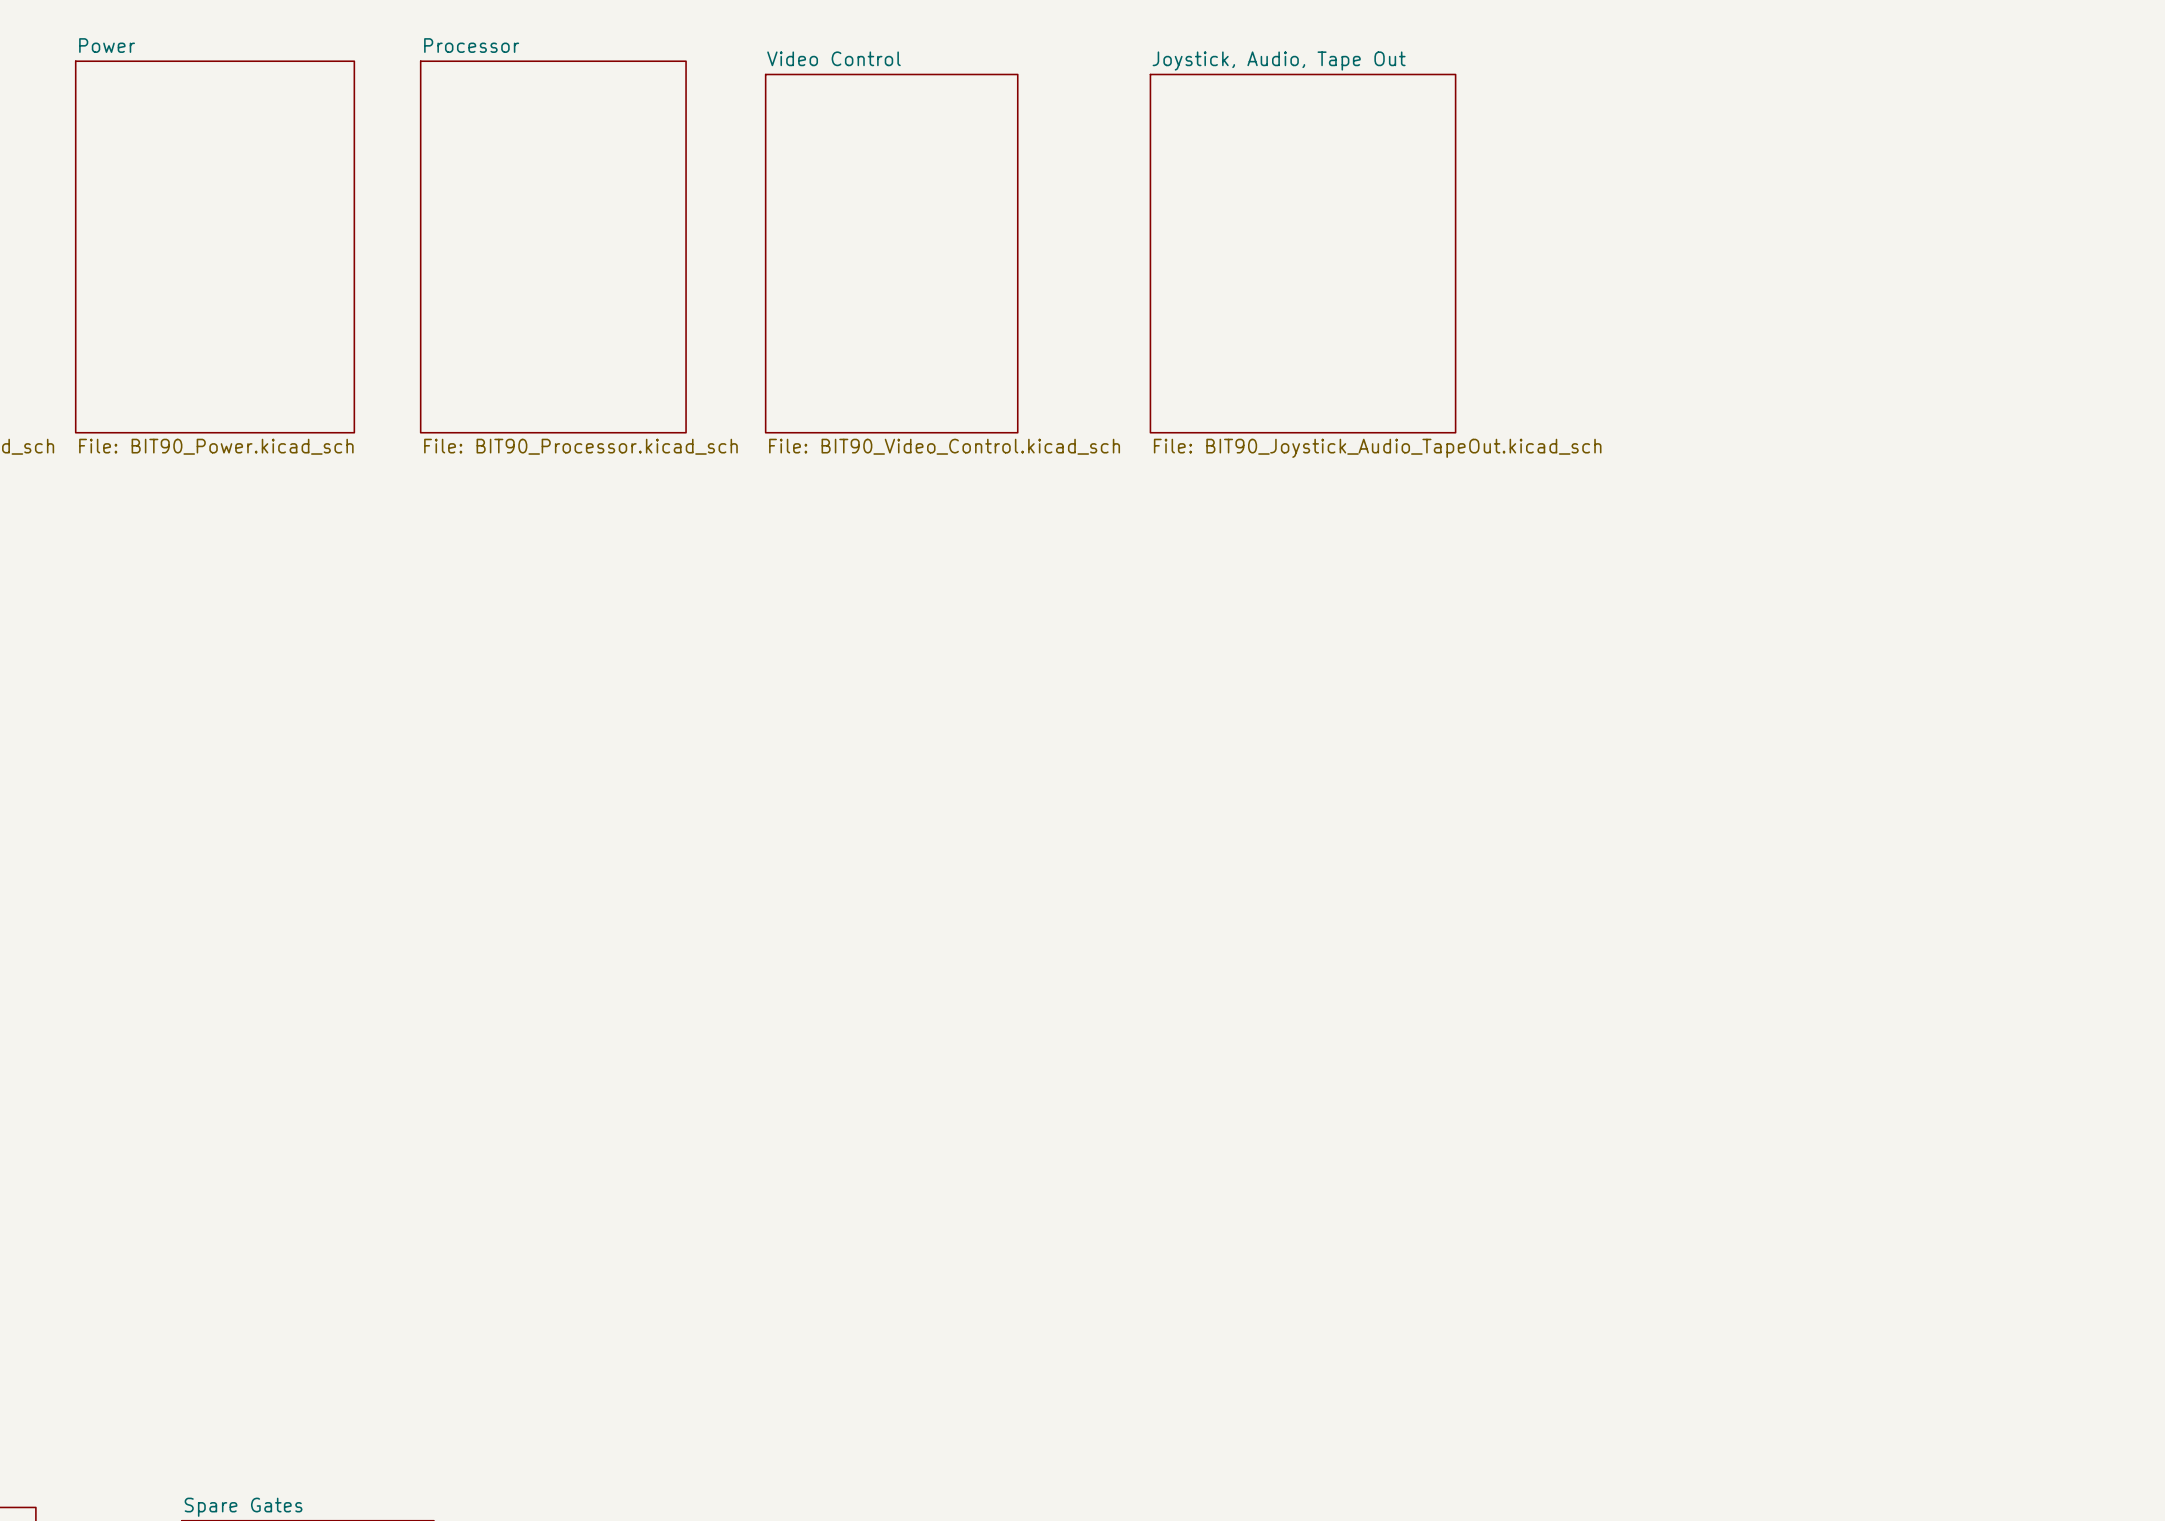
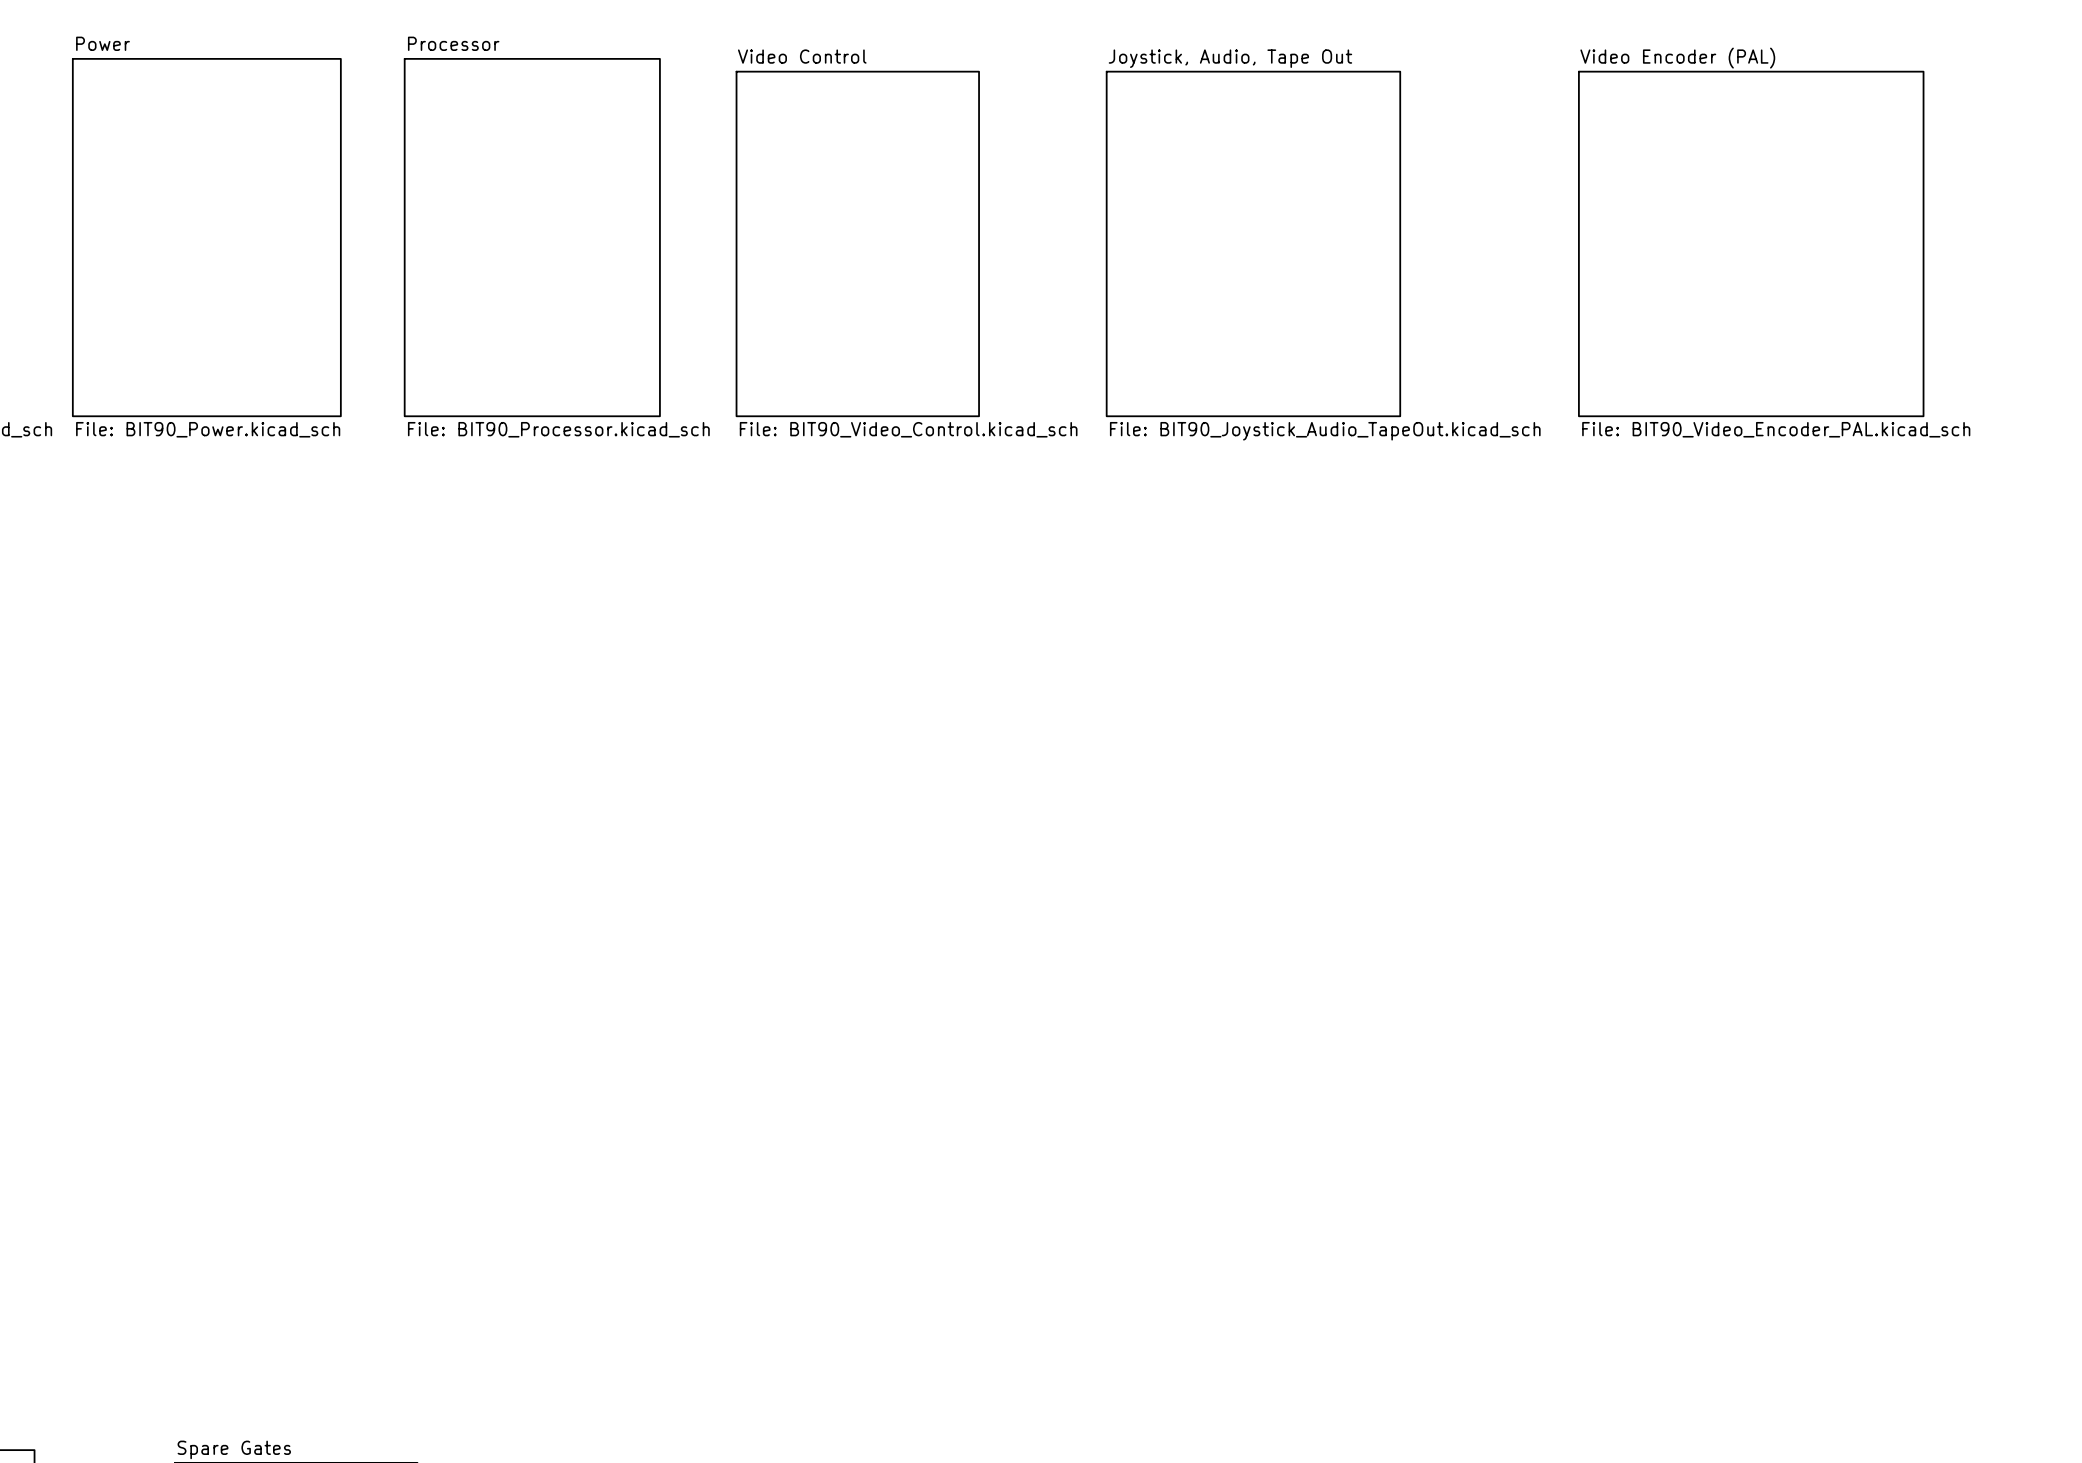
sheet Video Encoder (PAL): none -> File: BIT90_Video_Encoder_PAL.kicad_sch (1751, 243)

